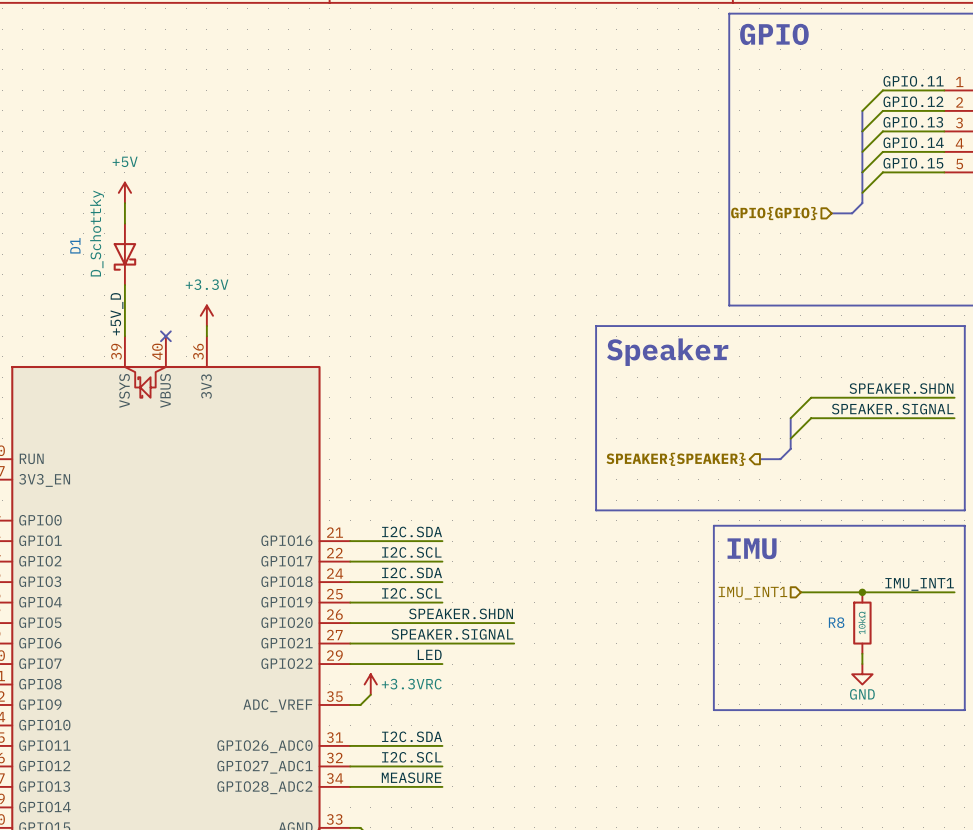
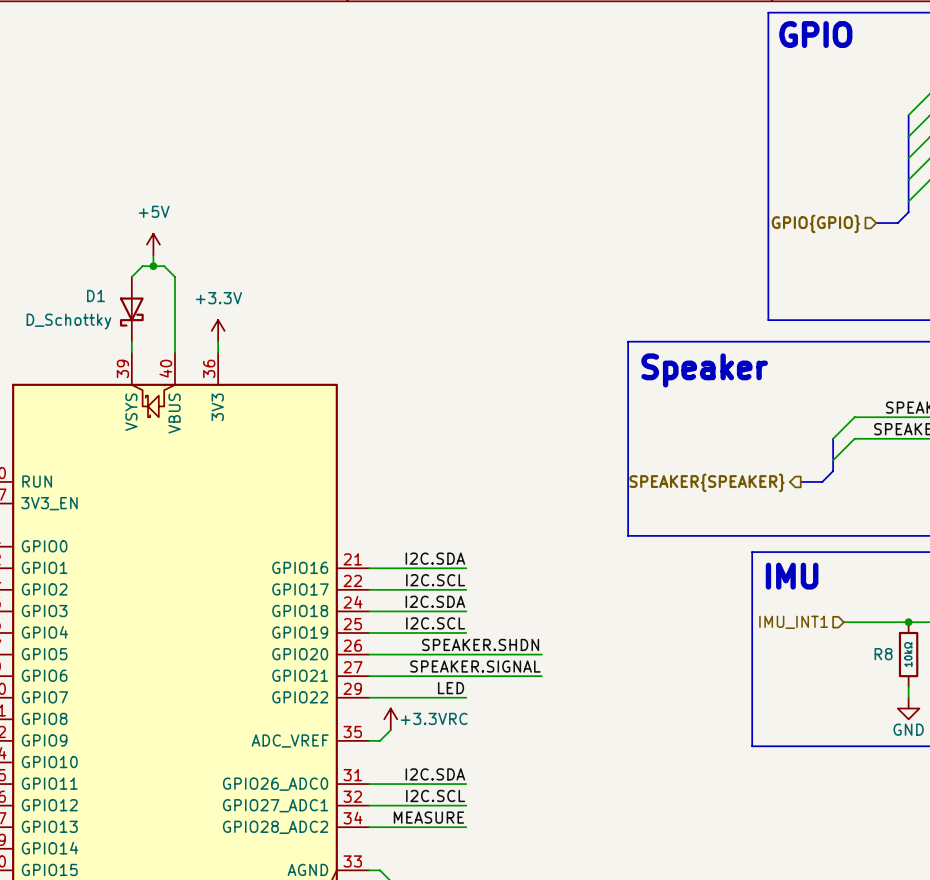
power symbol position: +5V (124, 192) -> +5V (153, 244)
wire: (124, 203) (124, 223) -> none
D1 value rotation: 0° (97, 233) -> 90° clockwise (68, 321)
wire: none -> (153, 255) (153, 266)
D1 name rotation: 0° (75, 245) -> 90° clockwise (96, 295)
D1 position: (124, 254) -> (131, 309)
junction: none -> (153, 266)
wire: none -> (131, 276) (142, 266) (164, 266) (174, 276) (174, 352)
label: +5V_D (117, 314) -> none
no-connect mark: (165, 336) -> none

